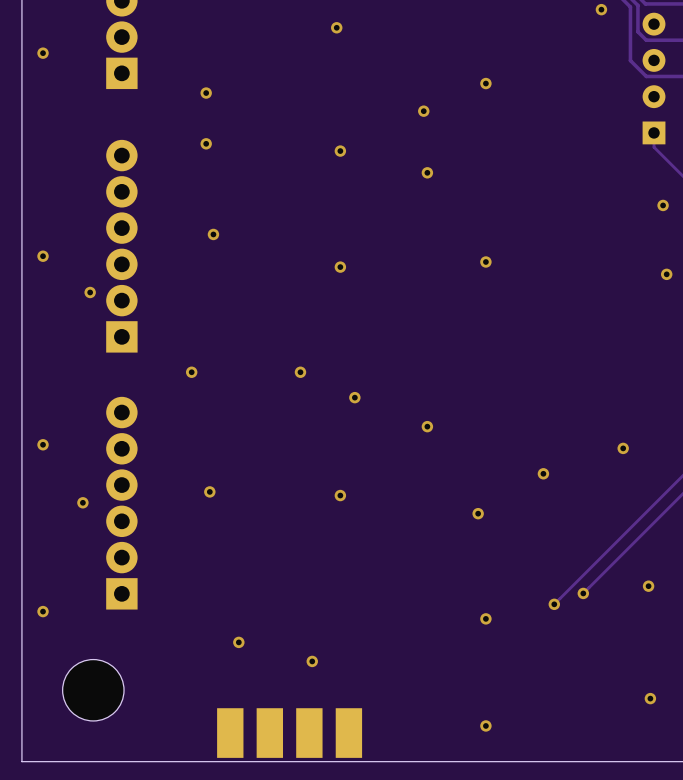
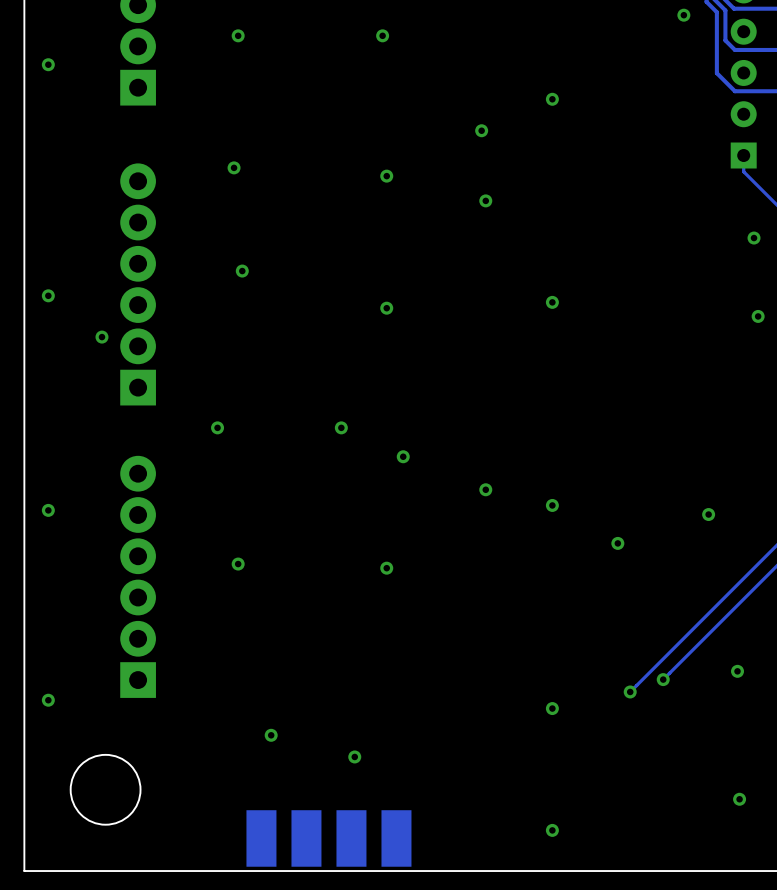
via position: (206, 93) -> (238, 35)
via: (82, 502) -> none
via position: (478, 513) -> (552, 505)

